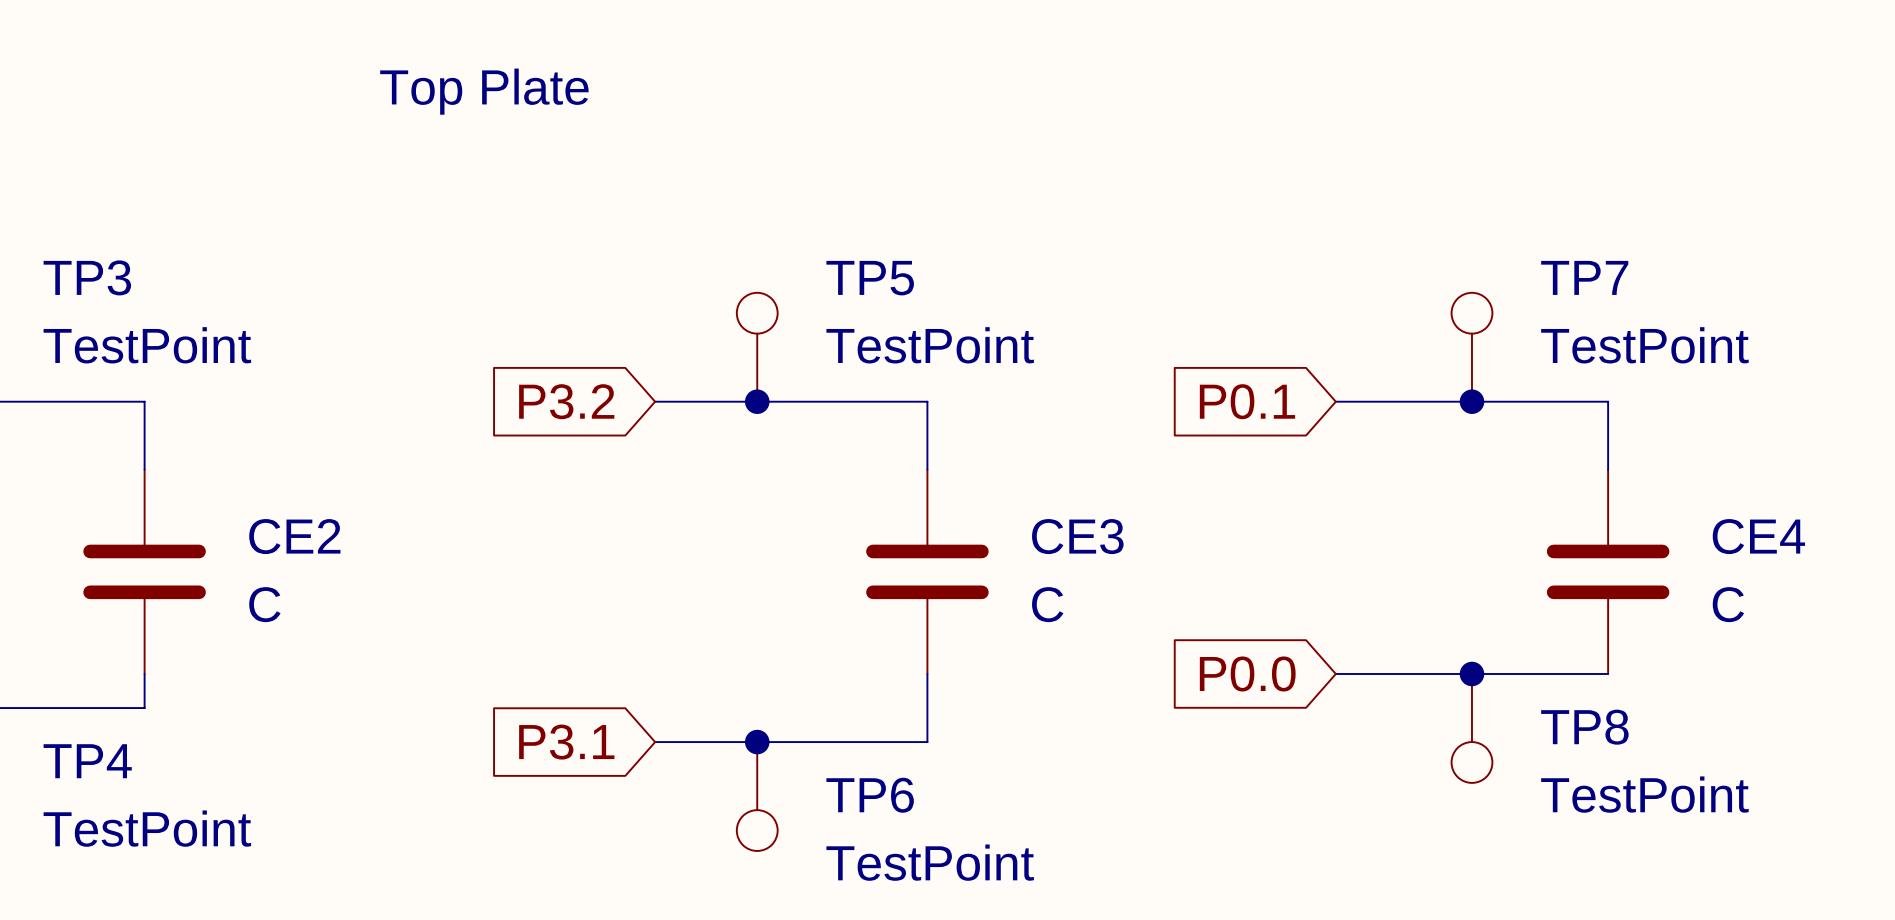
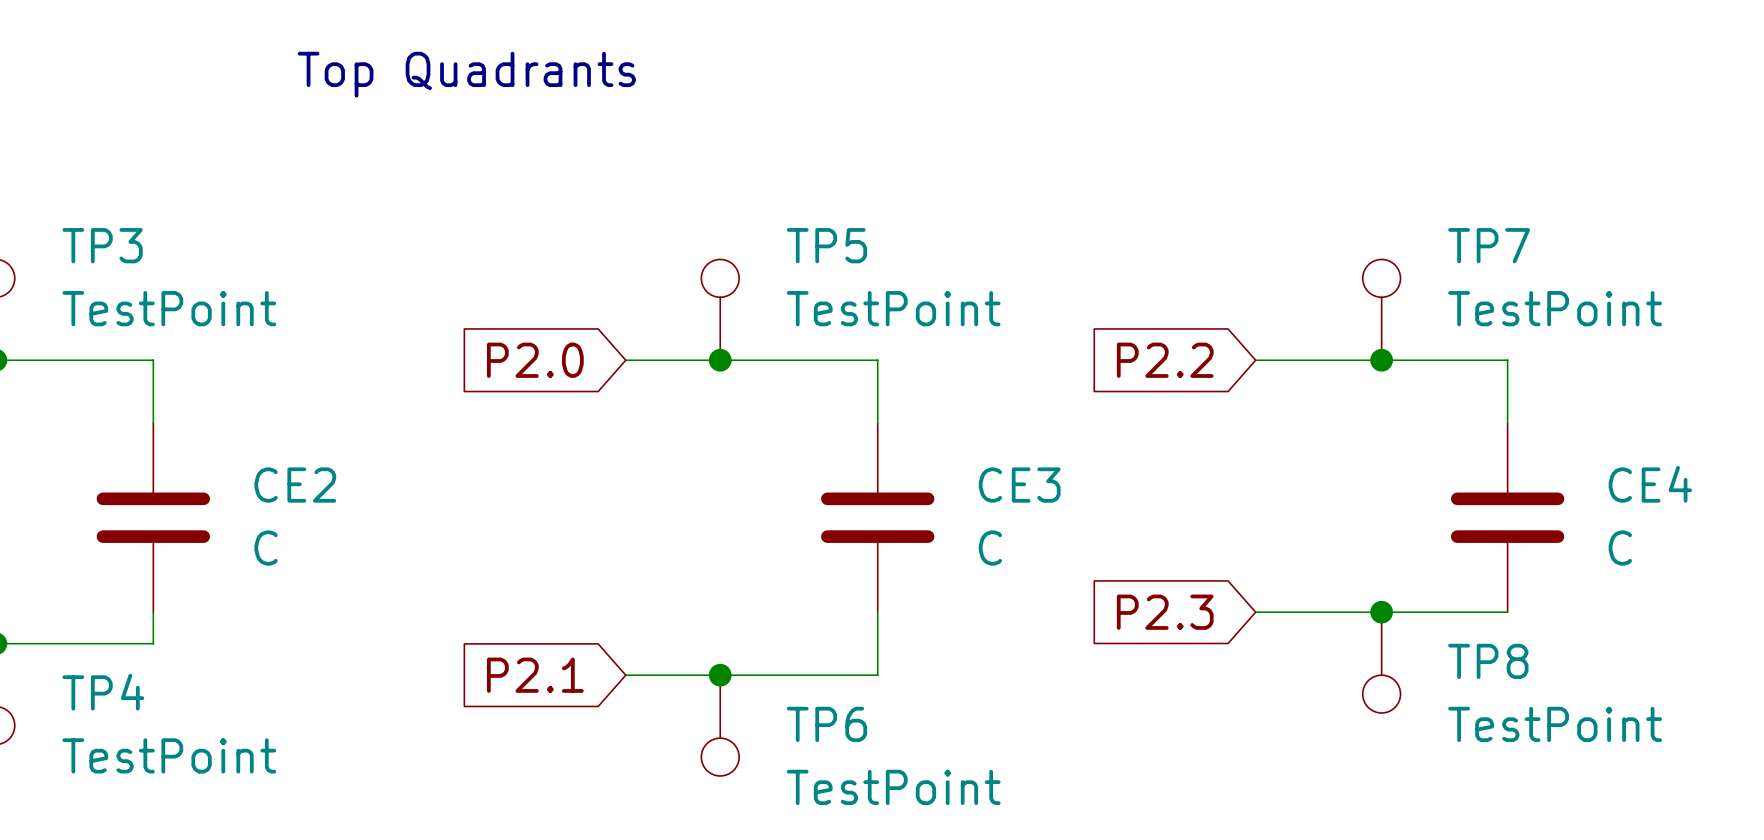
text: Top Plate (484, 91) -> Top Quadrants (466, 74)
global label: P3.2 (566, 401) -> P2.0 (535, 360)
global label: P0.1 (1247, 401) -> P2.2 (1165, 360)
global label: P0.0 (1247, 673) -> P2.3 (1165, 612)
global label: P3.1 (566, 742) -> P2.1 (535, 675)

